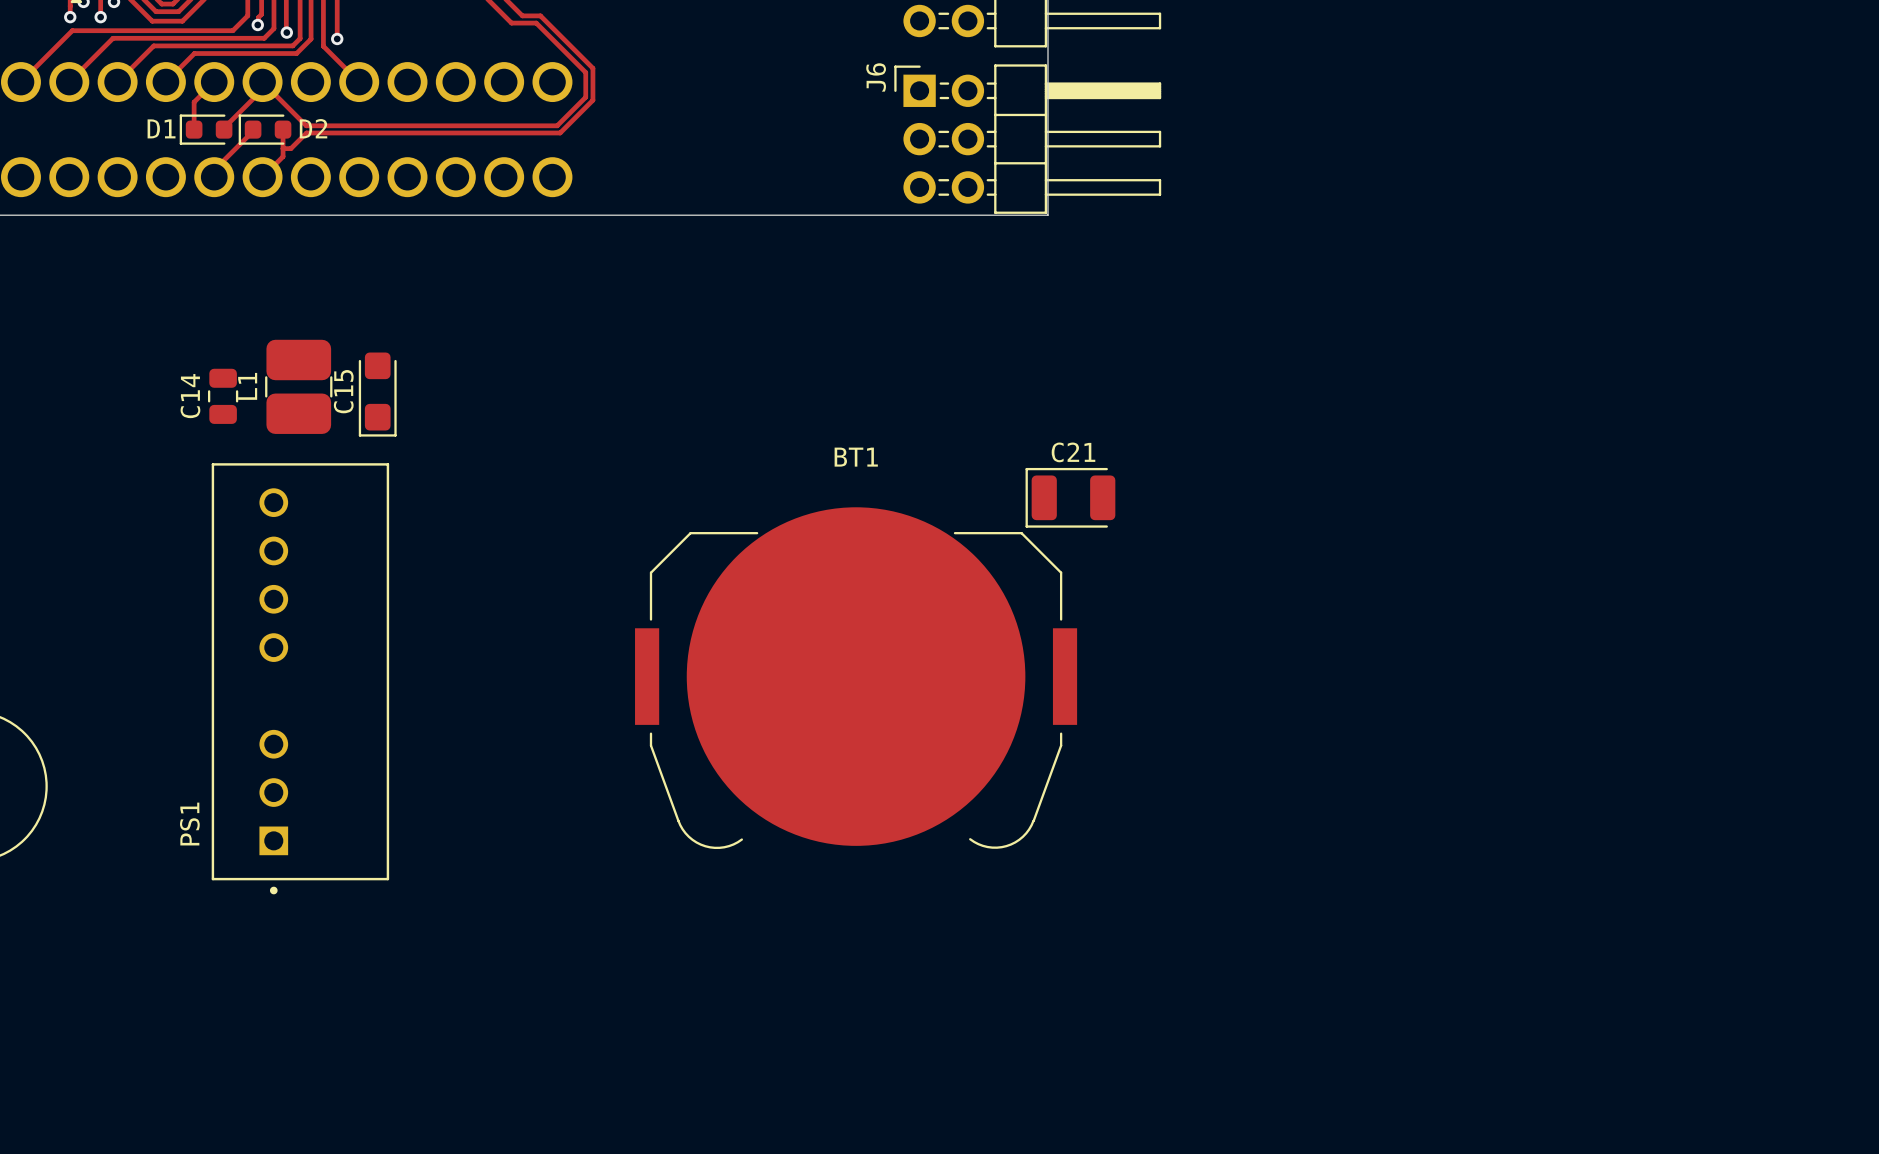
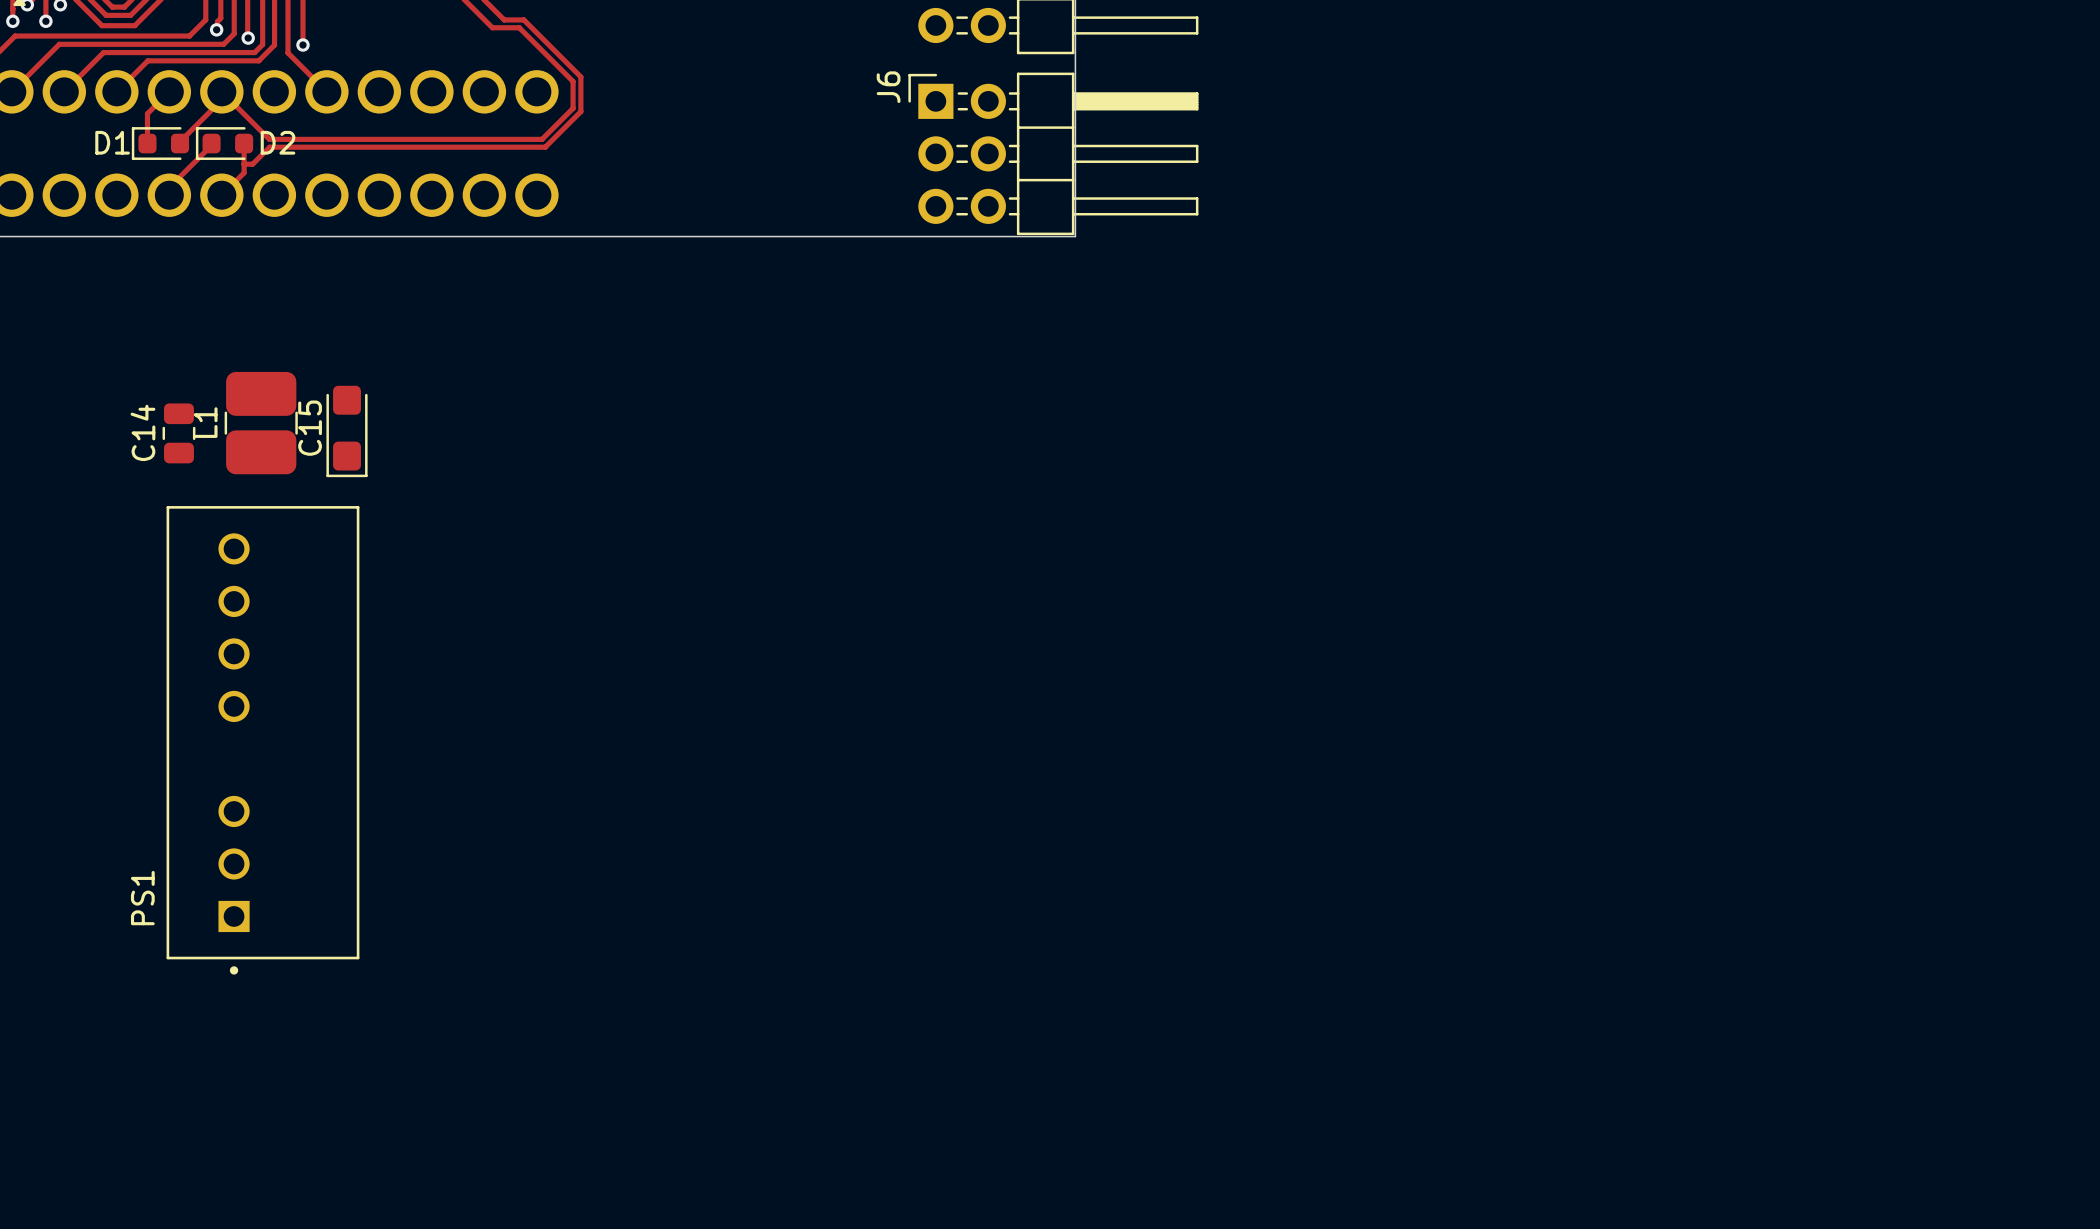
C21: (1070, 497) -> none
BT1: (856, 678) -> none

